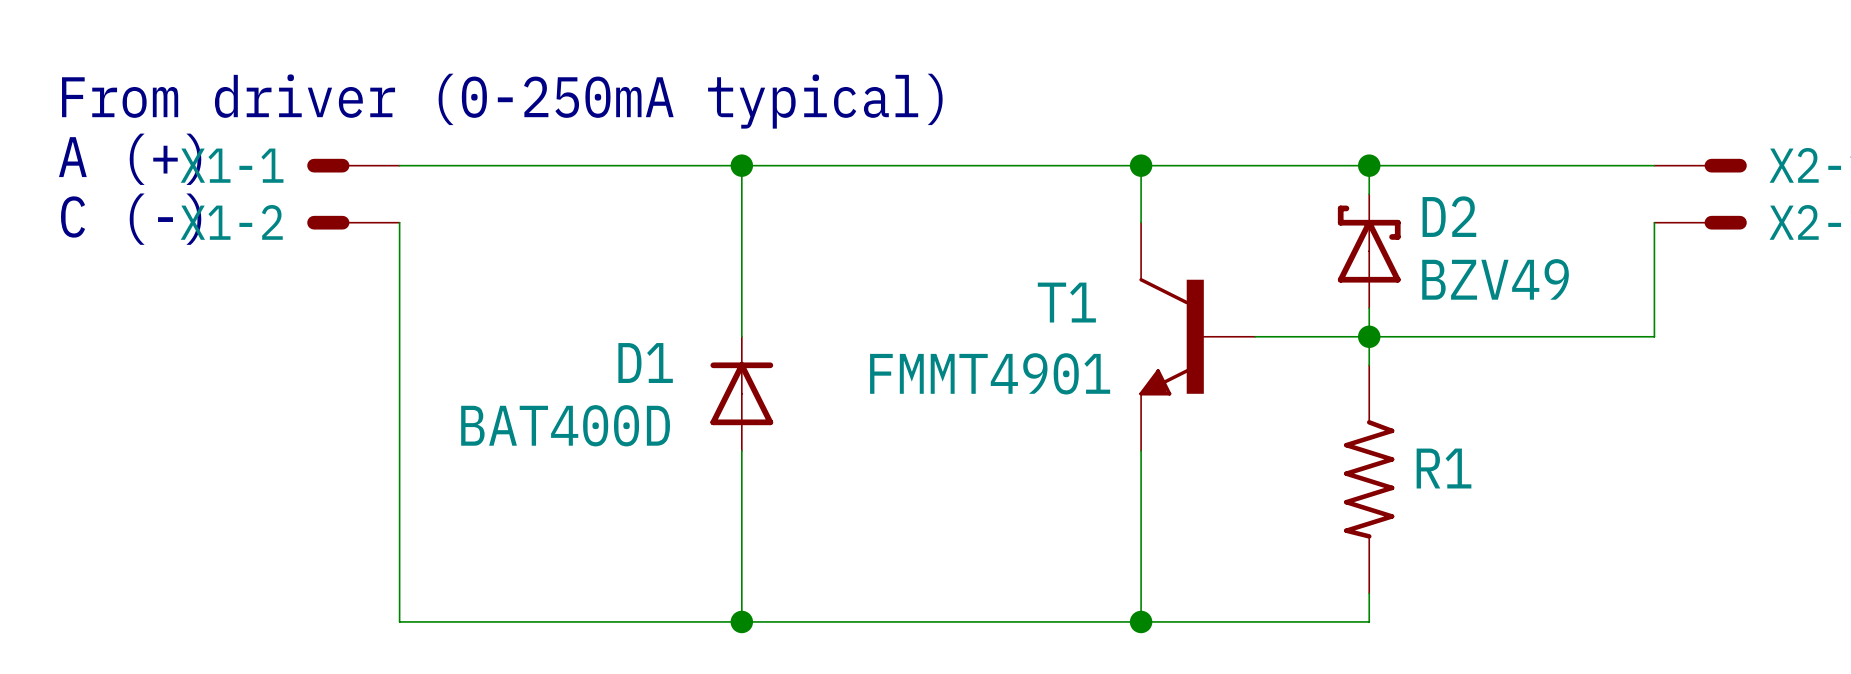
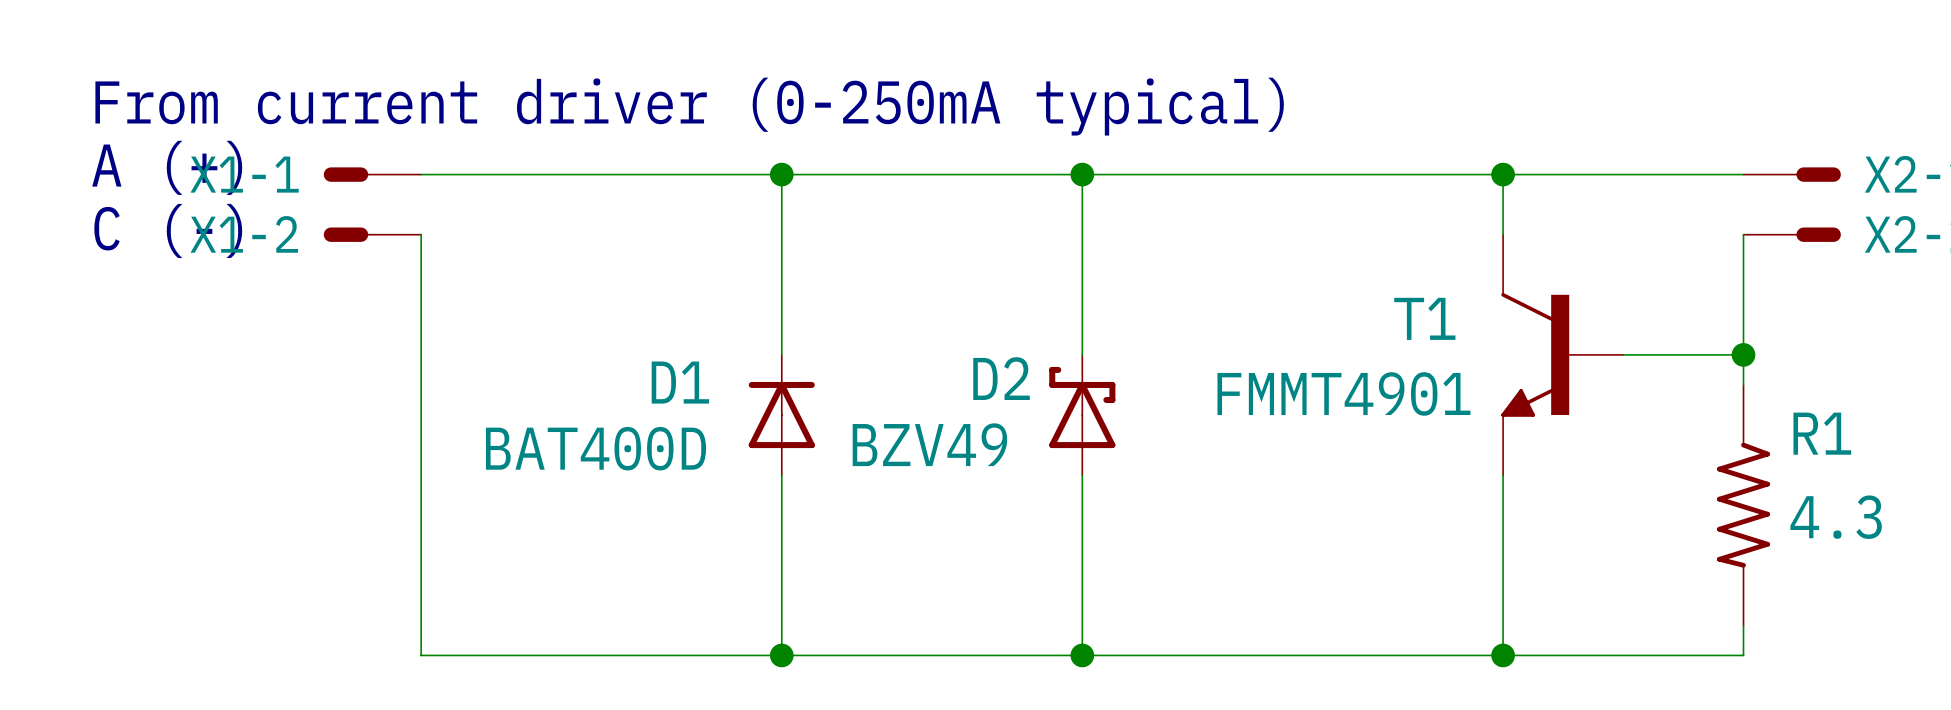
text: From driver (0-250mA typical) (502, 101) -> From current driver (0-250mA typical) (689, 106)
text position: A (+) (130, 159) -> A (+) (167, 167)
wire: none -> (1082, 174) (1082, 354)
wire: (1141, 165) (1141, 222) -> (1503, 174) (1503, 234)
junction position: (1141, 165) -> (1082, 174)
wire: (1369, 165) (1369, 194) -> (1743, 354) (1743, 384)
junction position: (1369, 165) -> (1503, 174)
D2 name position: D2 (1449, 216) -> D2 (1001, 378)
text position: C (-) (131, 219) -> C (-) (168, 230)
D2 position: (1369, 251) -> (1082, 415)
D2 value position: BZV49 (1495, 279) -> BZV49 (929, 444)
wire: (1369, 308) (1369, 365) -> none
T1 position: (1197, 336) -> (1562, 354)
wire: (1255, 336) (1540, 336) -> none
junction: (1369, 336) -> none
junction: none -> (1743, 354)
wire: none -> (1082, 475) (1082, 655)
wire: (1141, 450) (1141, 621) -> (1503, 475) (1503, 655)
R1 name position: R1 (1444, 468) -> R1 (1822, 433)
R1 position: (1369, 479) -> (1743, 505)
R1 value: none -> 4.3 (1836, 517)
wire: (1369, 593) (1369, 621) -> (1743, 625) (1743, 655) (1442, 655)
junction position: (1141, 621) -> (1082, 655)
junction: none -> (1503, 655)

